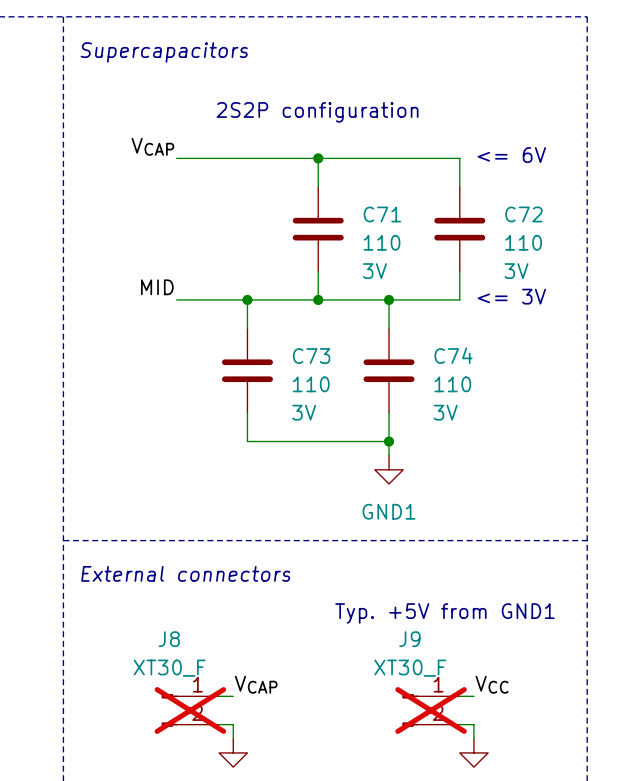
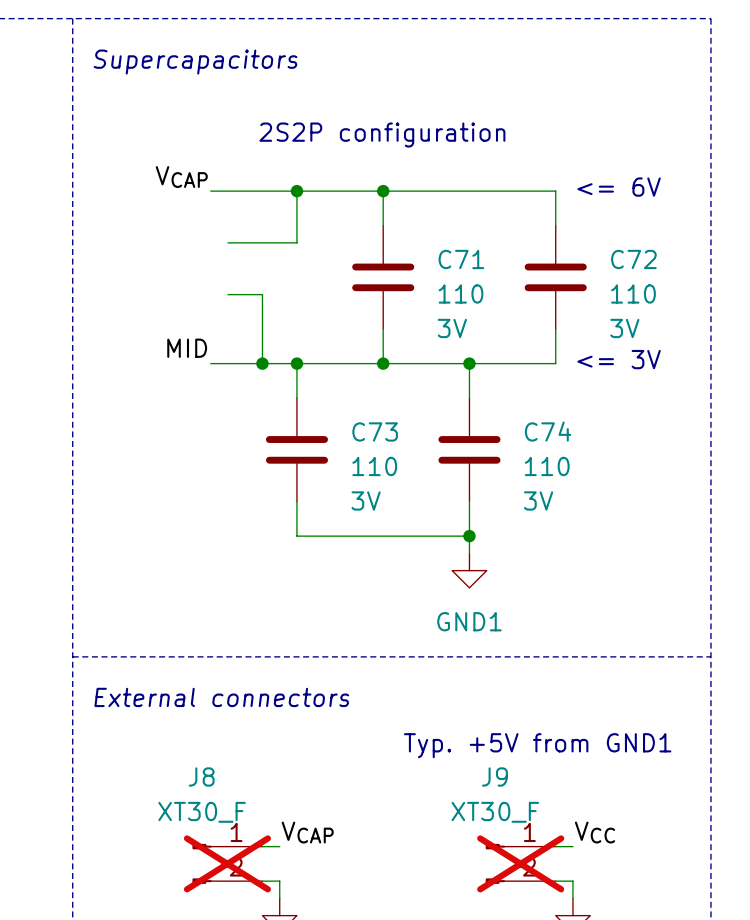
wire: none -> (296, 191) (296, 242) (227, 242)
junction: none -> (296, 191)
wire: none -> (227, 294) (262, 294) (262, 363)
junction: none -> (262, 363)

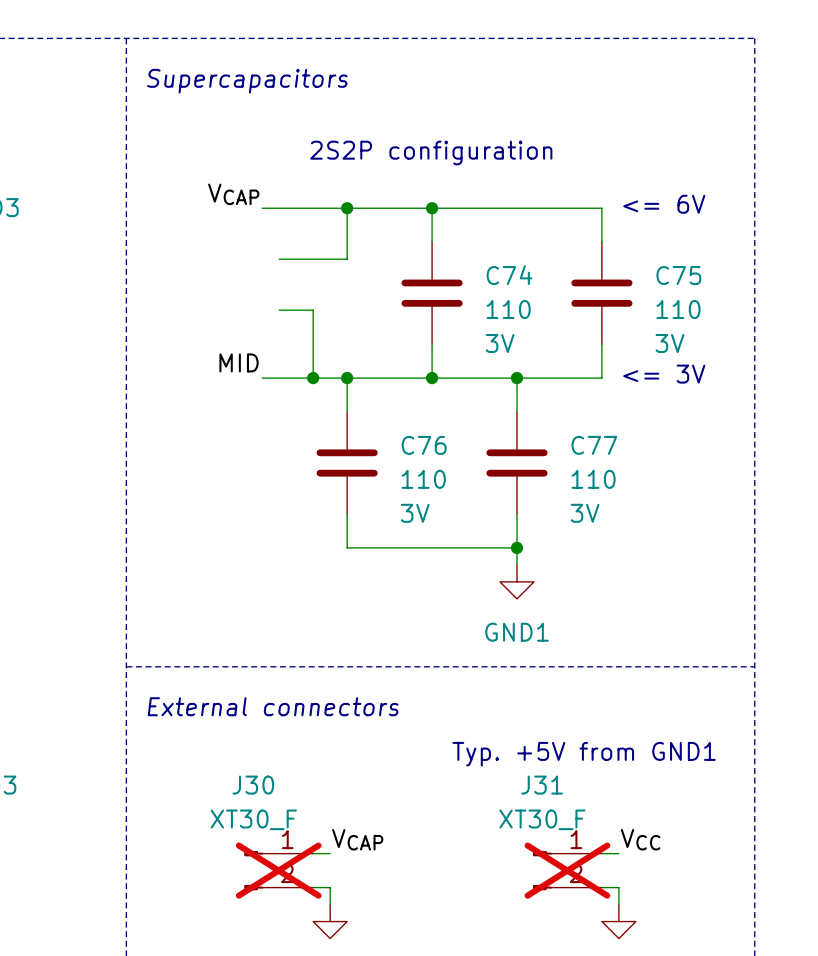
C71 name: C71 (461, 259) -> C74 (509, 275)
C72 name: C72 (633, 259) -> C75 (678, 275)
C73 name: C73 (375, 431) -> C76 (424, 445)
C74 name: C74 (548, 431) -> C77 (594, 445)
J8 name: J8 (201, 776) -> J30 (253, 785)
J9 name: J9 (494, 776) -> J31 (542, 785)

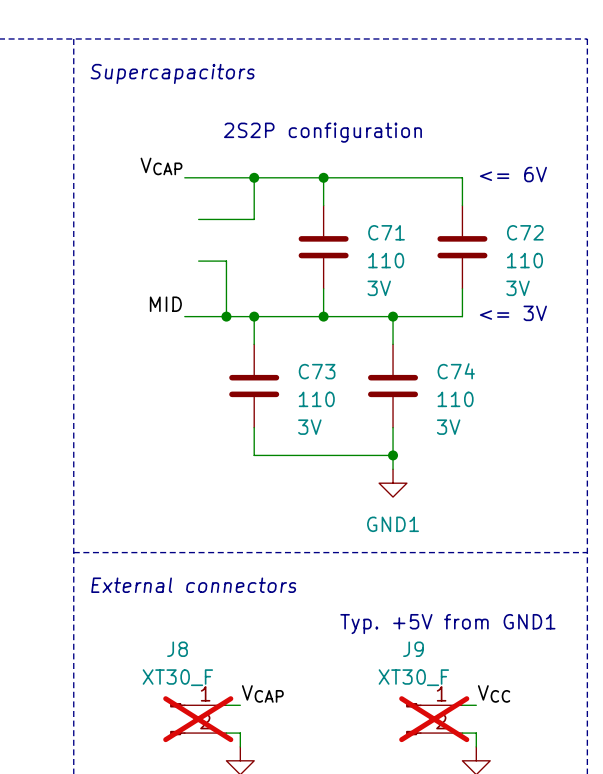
C74 name: C74 (509, 275) -> C71 (386, 232)
C75 name: C75 (678, 275) -> C72 (525, 232)
C76 name: C76 (424, 445) -> C73 (317, 371)
C77 name: C77 (594, 445) -> C74 (456, 371)
J30 name: J30 (253, 785) -> J8 (177, 649)
J31 name: J31 (542, 785) -> J9 (413, 649)

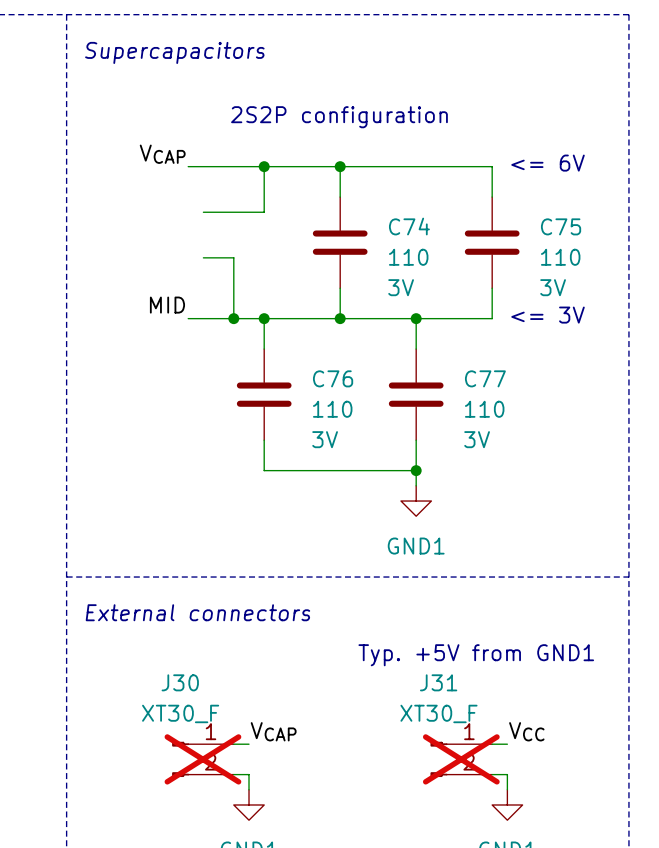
C71 name: C71 (386, 232) -> C74 (409, 226)
C72 name: C72 (525, 232) -> C75 (561, 226)
C73 name: C73 (317, 371) -> C76 (333, 378)
C74 name: C74 (456, 371) -> C77 (485, 378)
J8 name: J8 (177, 649) -> J30 (180, 682)
J9 name: J9 (413, 649) -> J31 (438, 682)

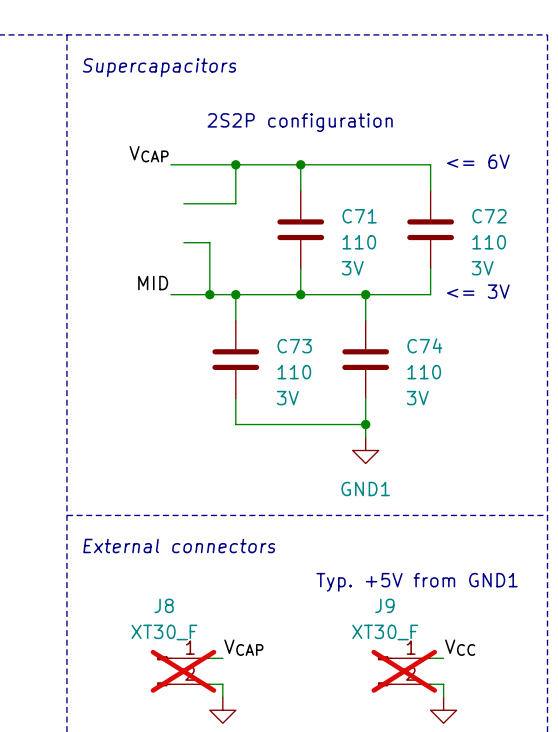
C74 name: C74 (409, 226) -> C71 (359, 216)
C75 name: C75 (561, 226) -> C72 (489, 216)
C76 name: C76 (333, 378) -> C73 (294, 346)
C77 name: C77 (485, 378) -> C74 (424, 345)
J30 name: J30 (180, 682) -> J8 (164, 605)
J31 name: J31 (438, 682) -> J9 (384, 605)

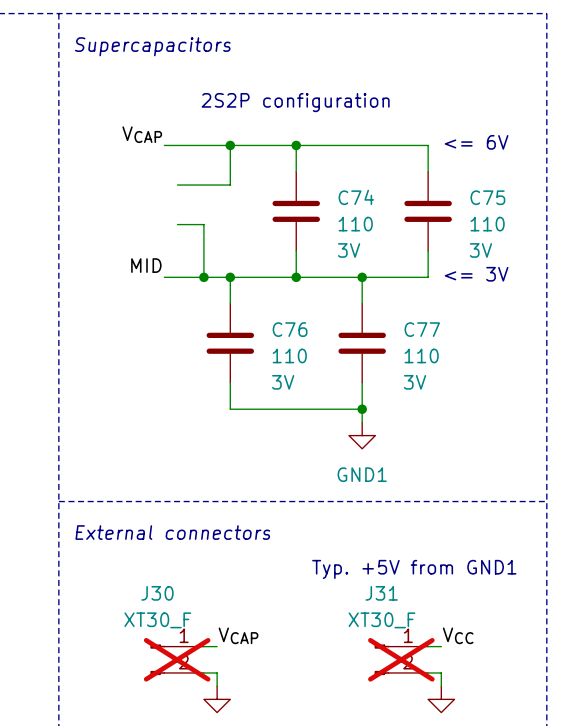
C71 name: C71 (359, 216) -> C74 (356, 197)
C72 name: C72 (489, 216) -> C75 (487, 197)
C74 name: C74 (424, 345) -> C77 (422, 329)
C73 name: C73 (294, 346) -> C76 (290, 329)
J8 name: J8 (164, 605) -> J30 (157, 593)
J9 name: J9 (384, 605) -> J31 (381, 593)

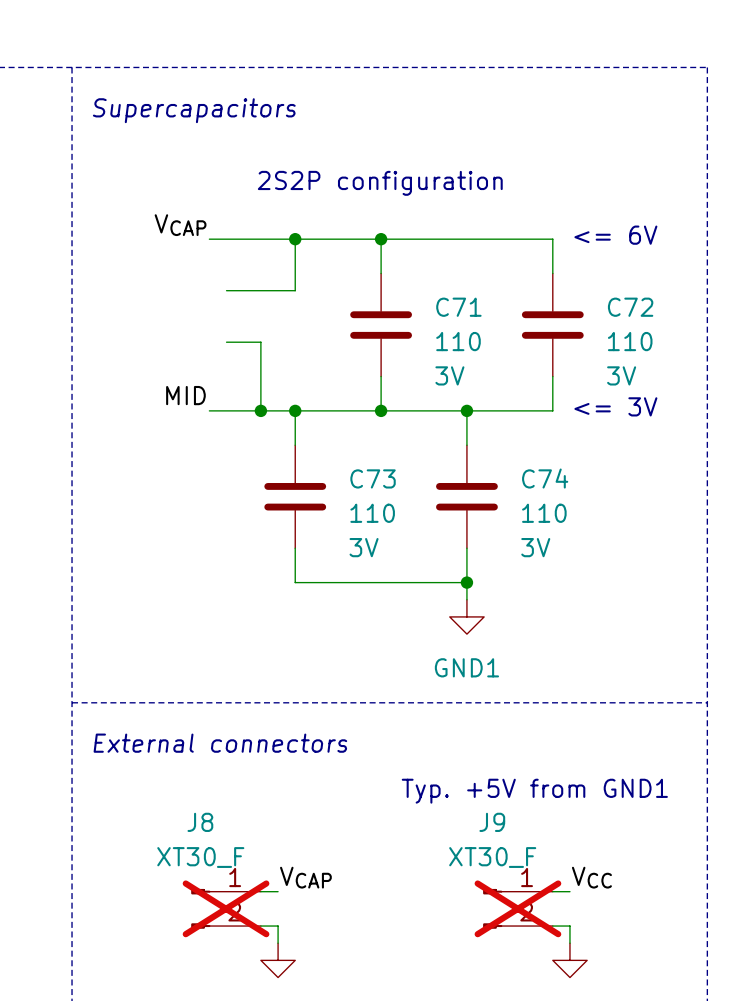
C74 name: C74 (356, 197) -> C71 (458, 307)
C75 name: C75 (487, 197) -> C72 (630, 307)
C76 name: C76 (290, 329) -> C73 (373, 478)
C77 name: C77 (422, 329) -> C74 (545, 478)
J30 name: J30 (157, 593) -> J8 (200, 822)
J31 name: J31 (381, 593) -> J9 (492, 822)

